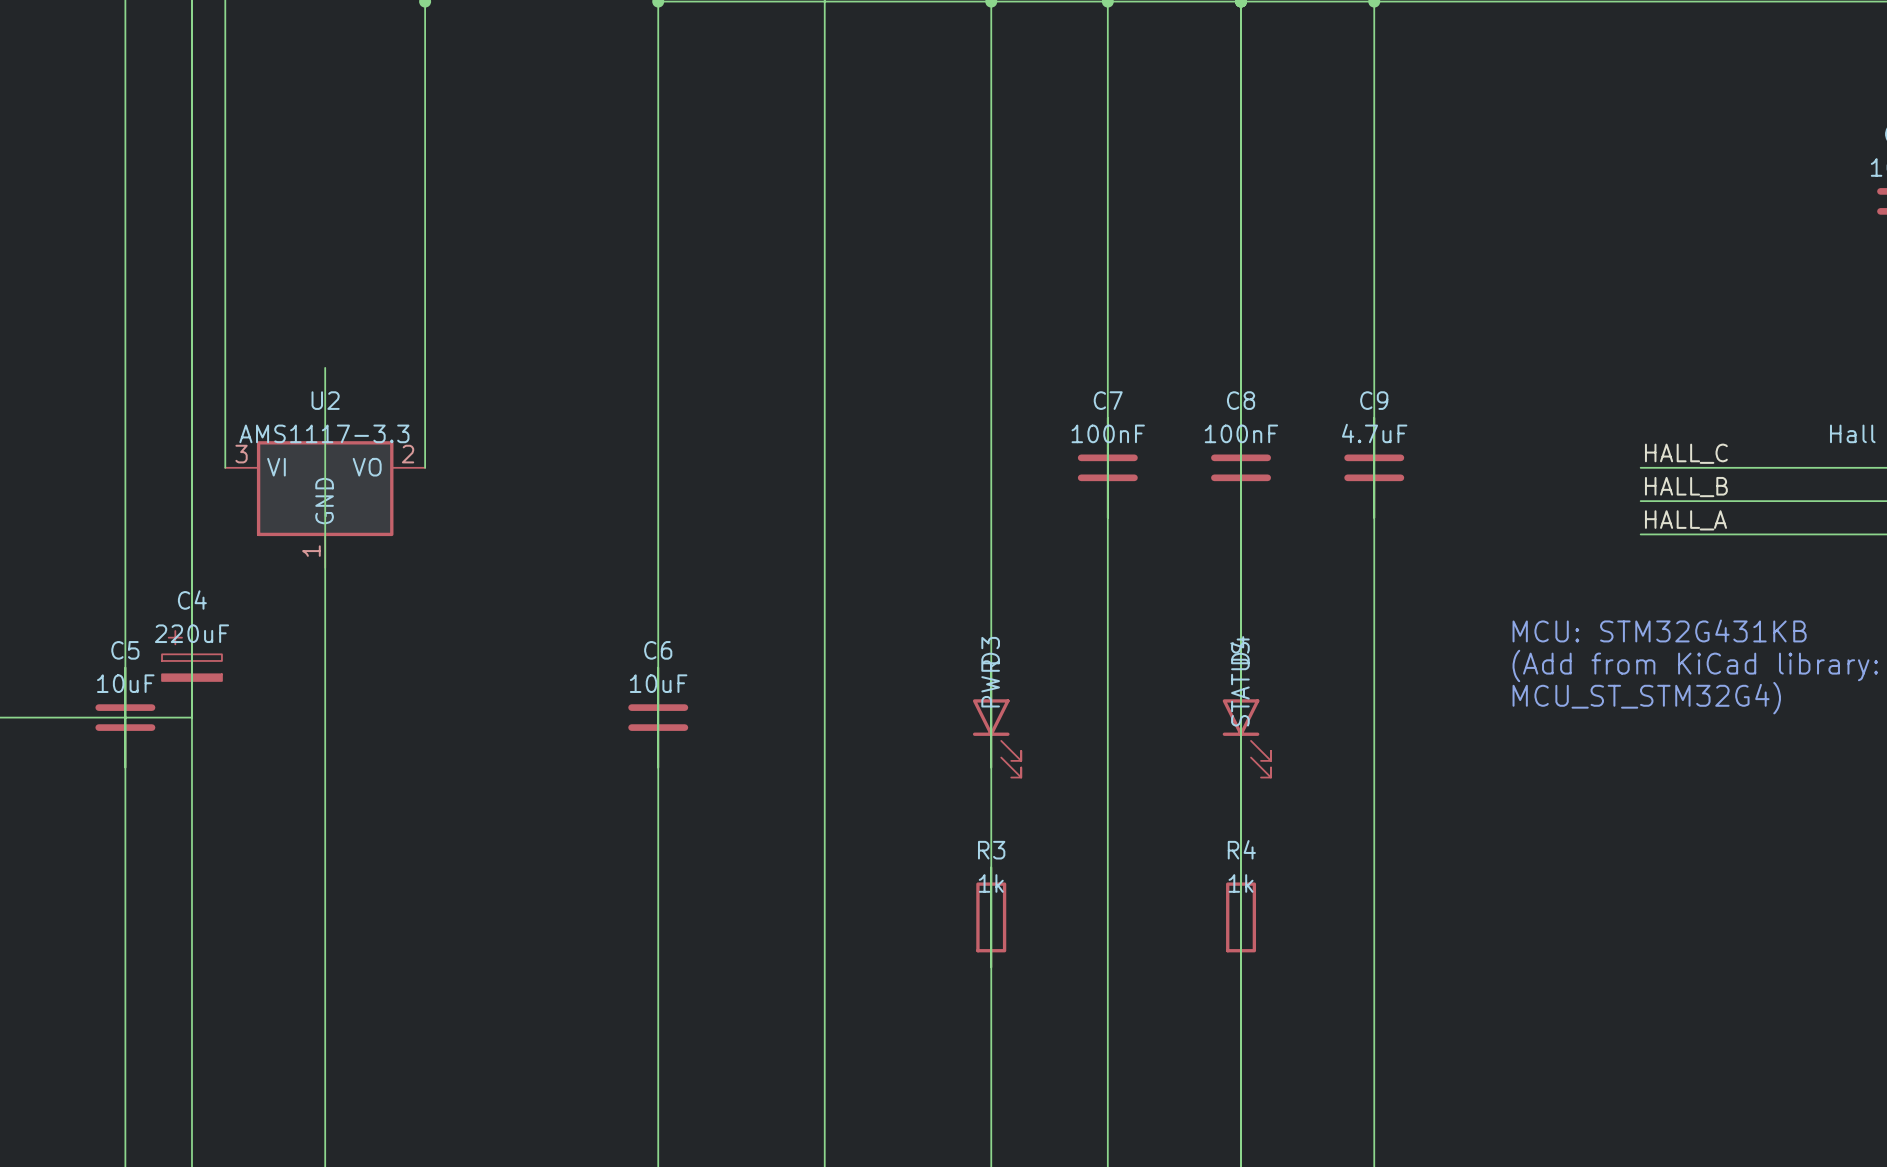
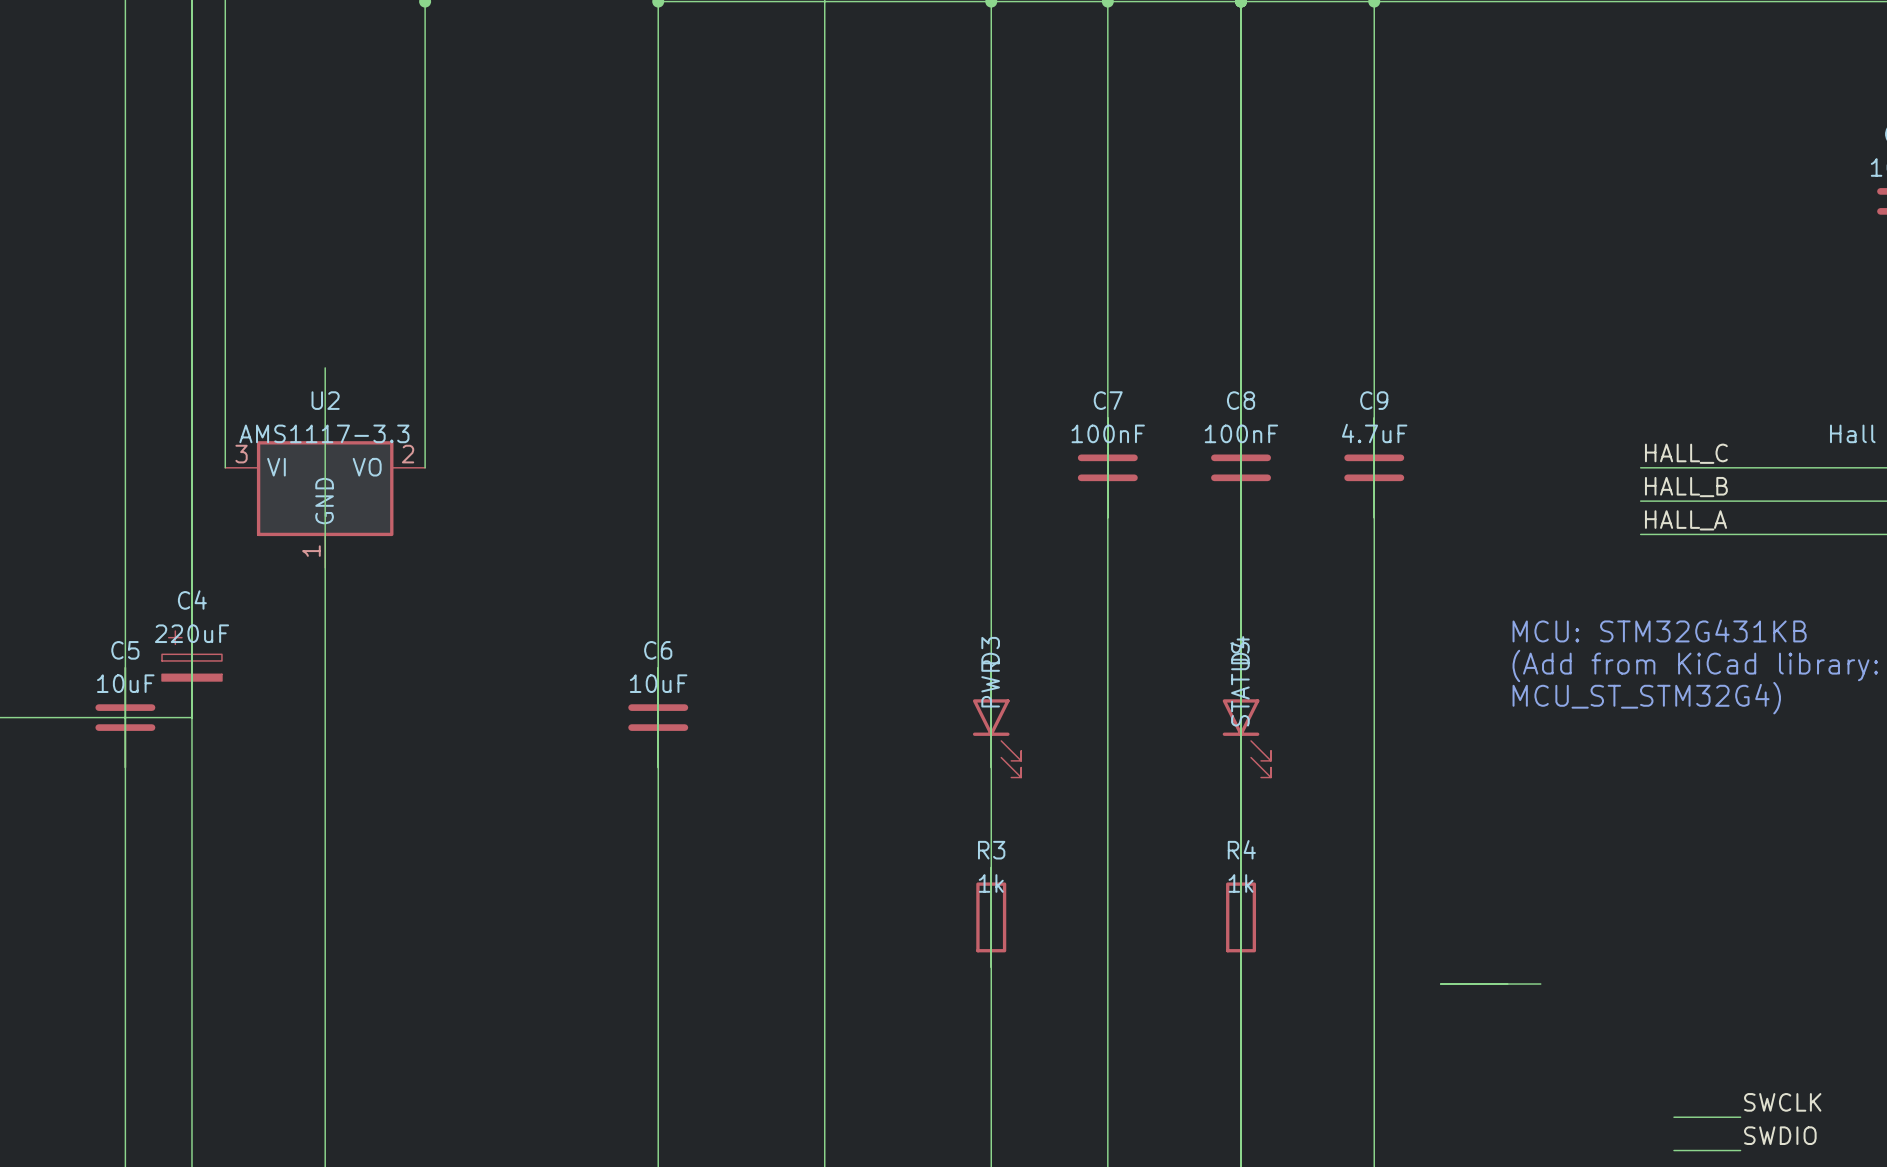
wire: none -> (1440, 984) (1540, 984)
label: none -> SWCLK (1782, 1102)
wire: none -> (1673, 1117) (1740, 1117)
label: none -> SWDIO (1780, 1135)
wire: none -> (1673, 1150) (1740, 1150)

